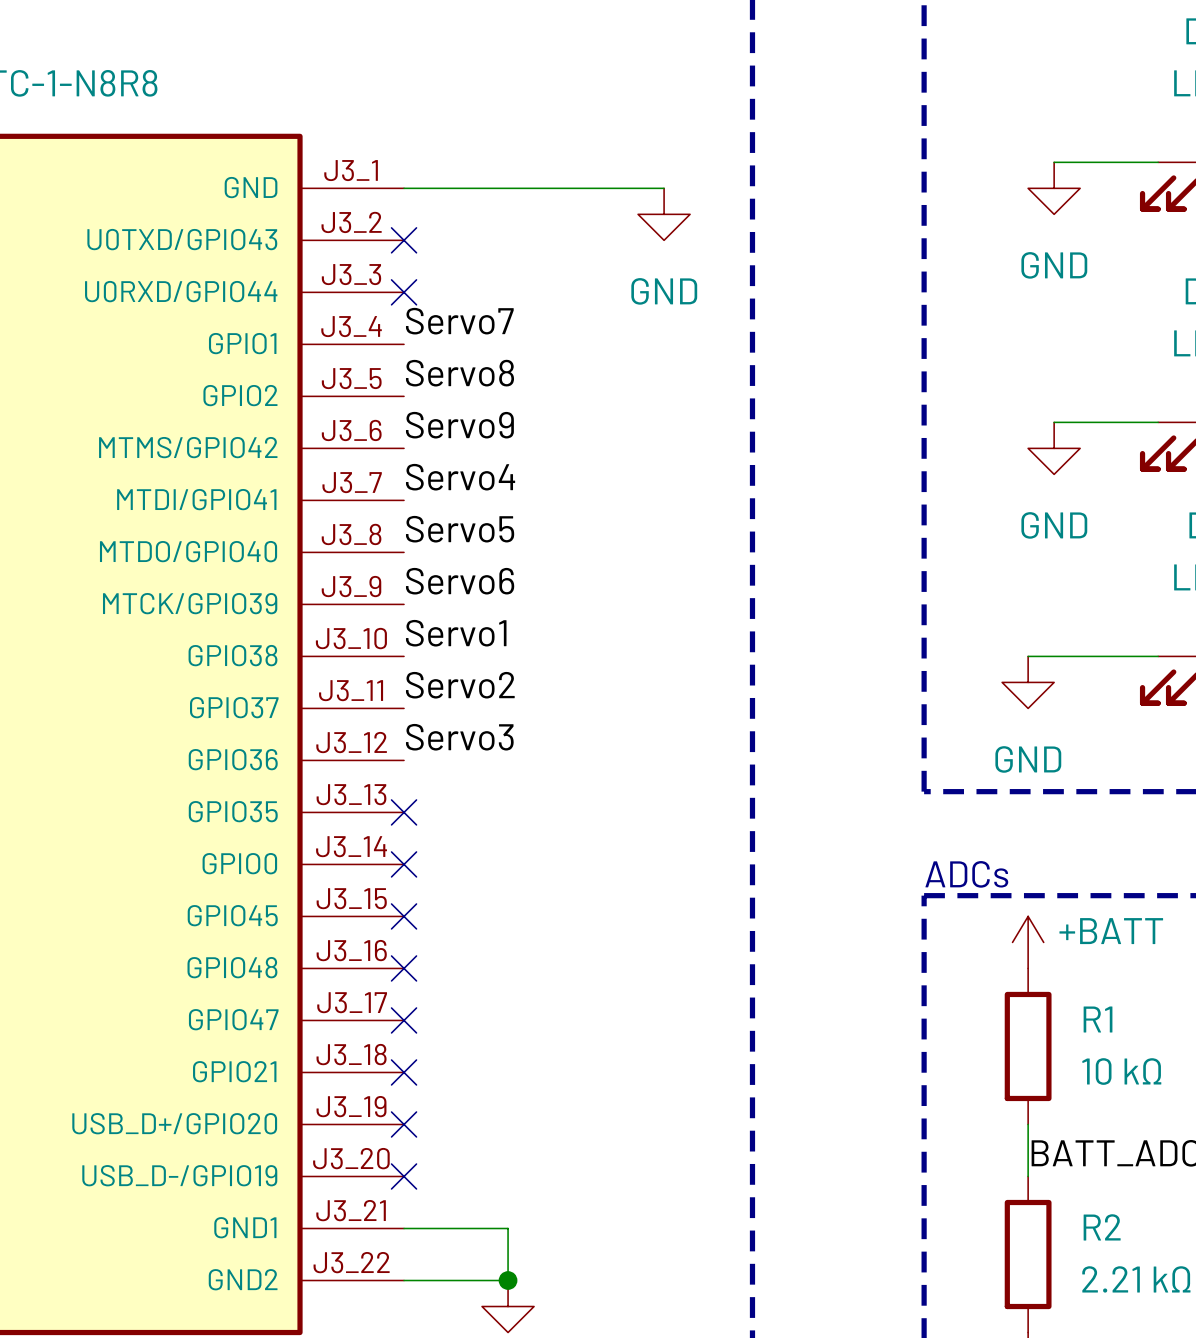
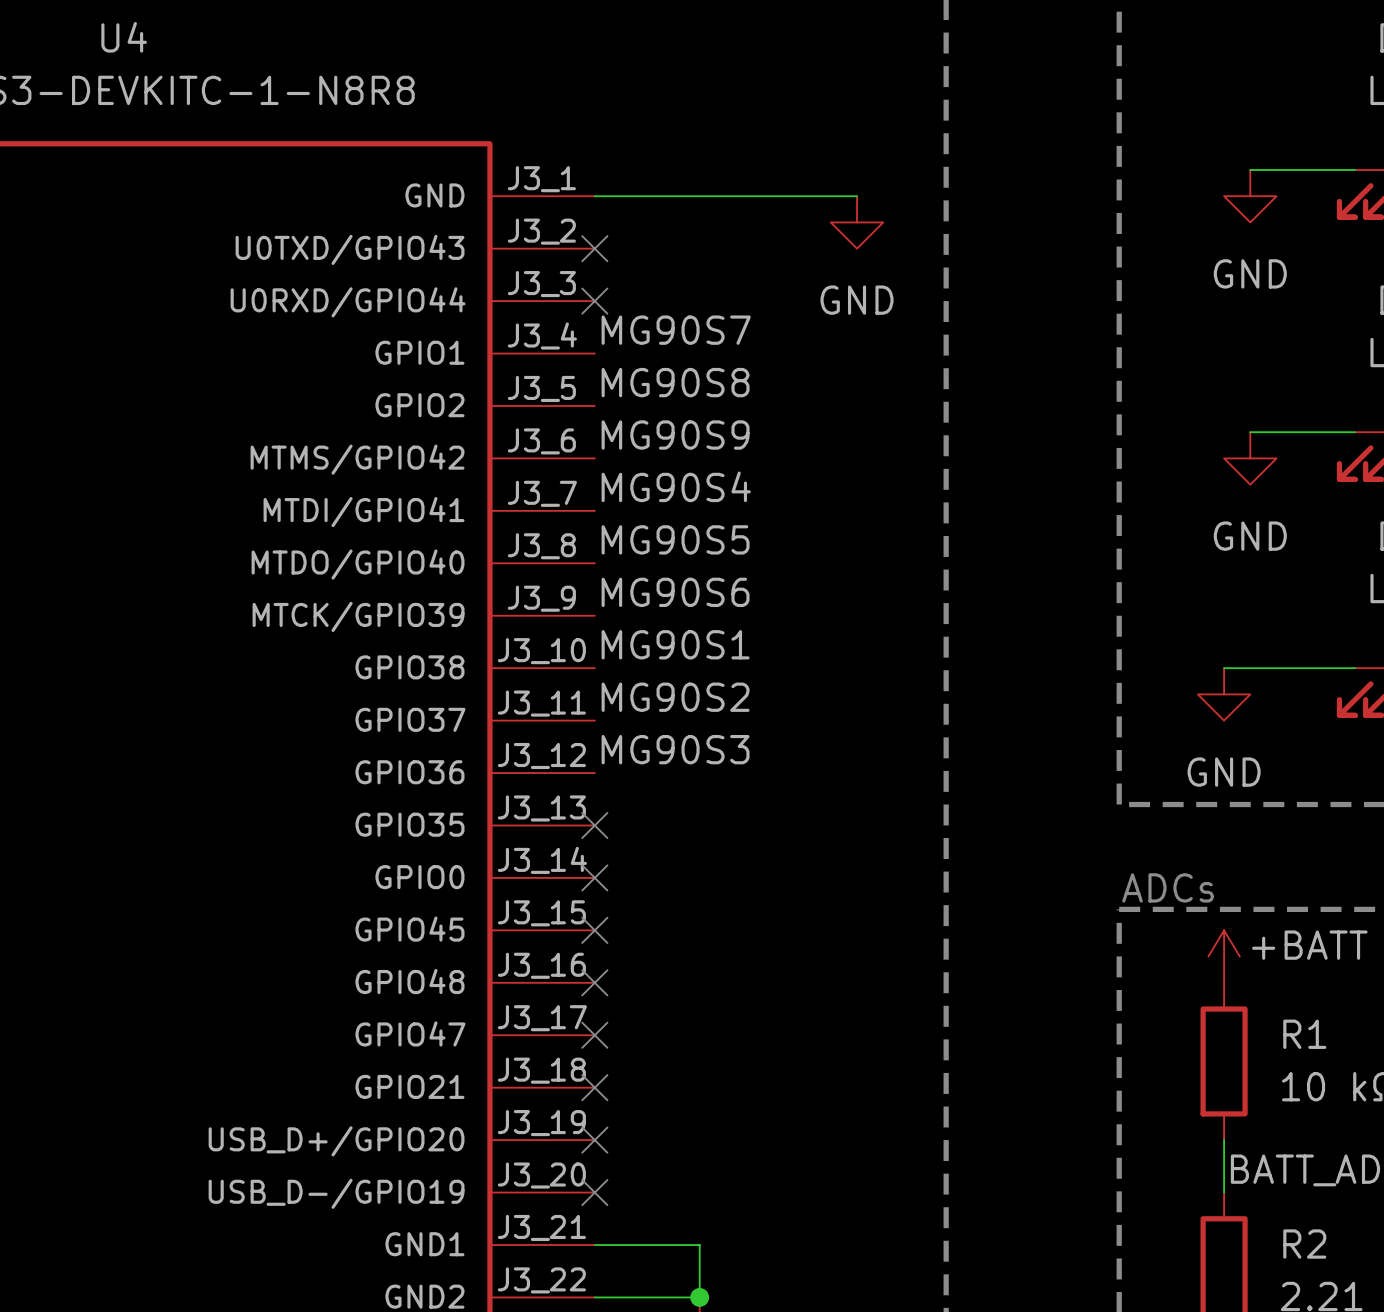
label: Servo7 (459, 321) -> MG90S7 (676, 330)
label: Servo8 (459, 373) -> MG90S8 (675, 382)
label: Servo9 (459, 425) -> MG90S9 (675, 435)
label: Servo4 (460, 477) -> MG90S4 (676, 486)
label: Servo5 (460, 529) -> MG90S5 (675, 539)
label: Servo6 (460, 581) -> MG90S6 (675, 592)
label: Servo1 (456, 633) -> MG90S1 (675, 644)
label: Servo2 (460, 685) -> MG90S2 (675, 697)
label: Servo3 (459, 737) -> MG90S3 (675, 749)

